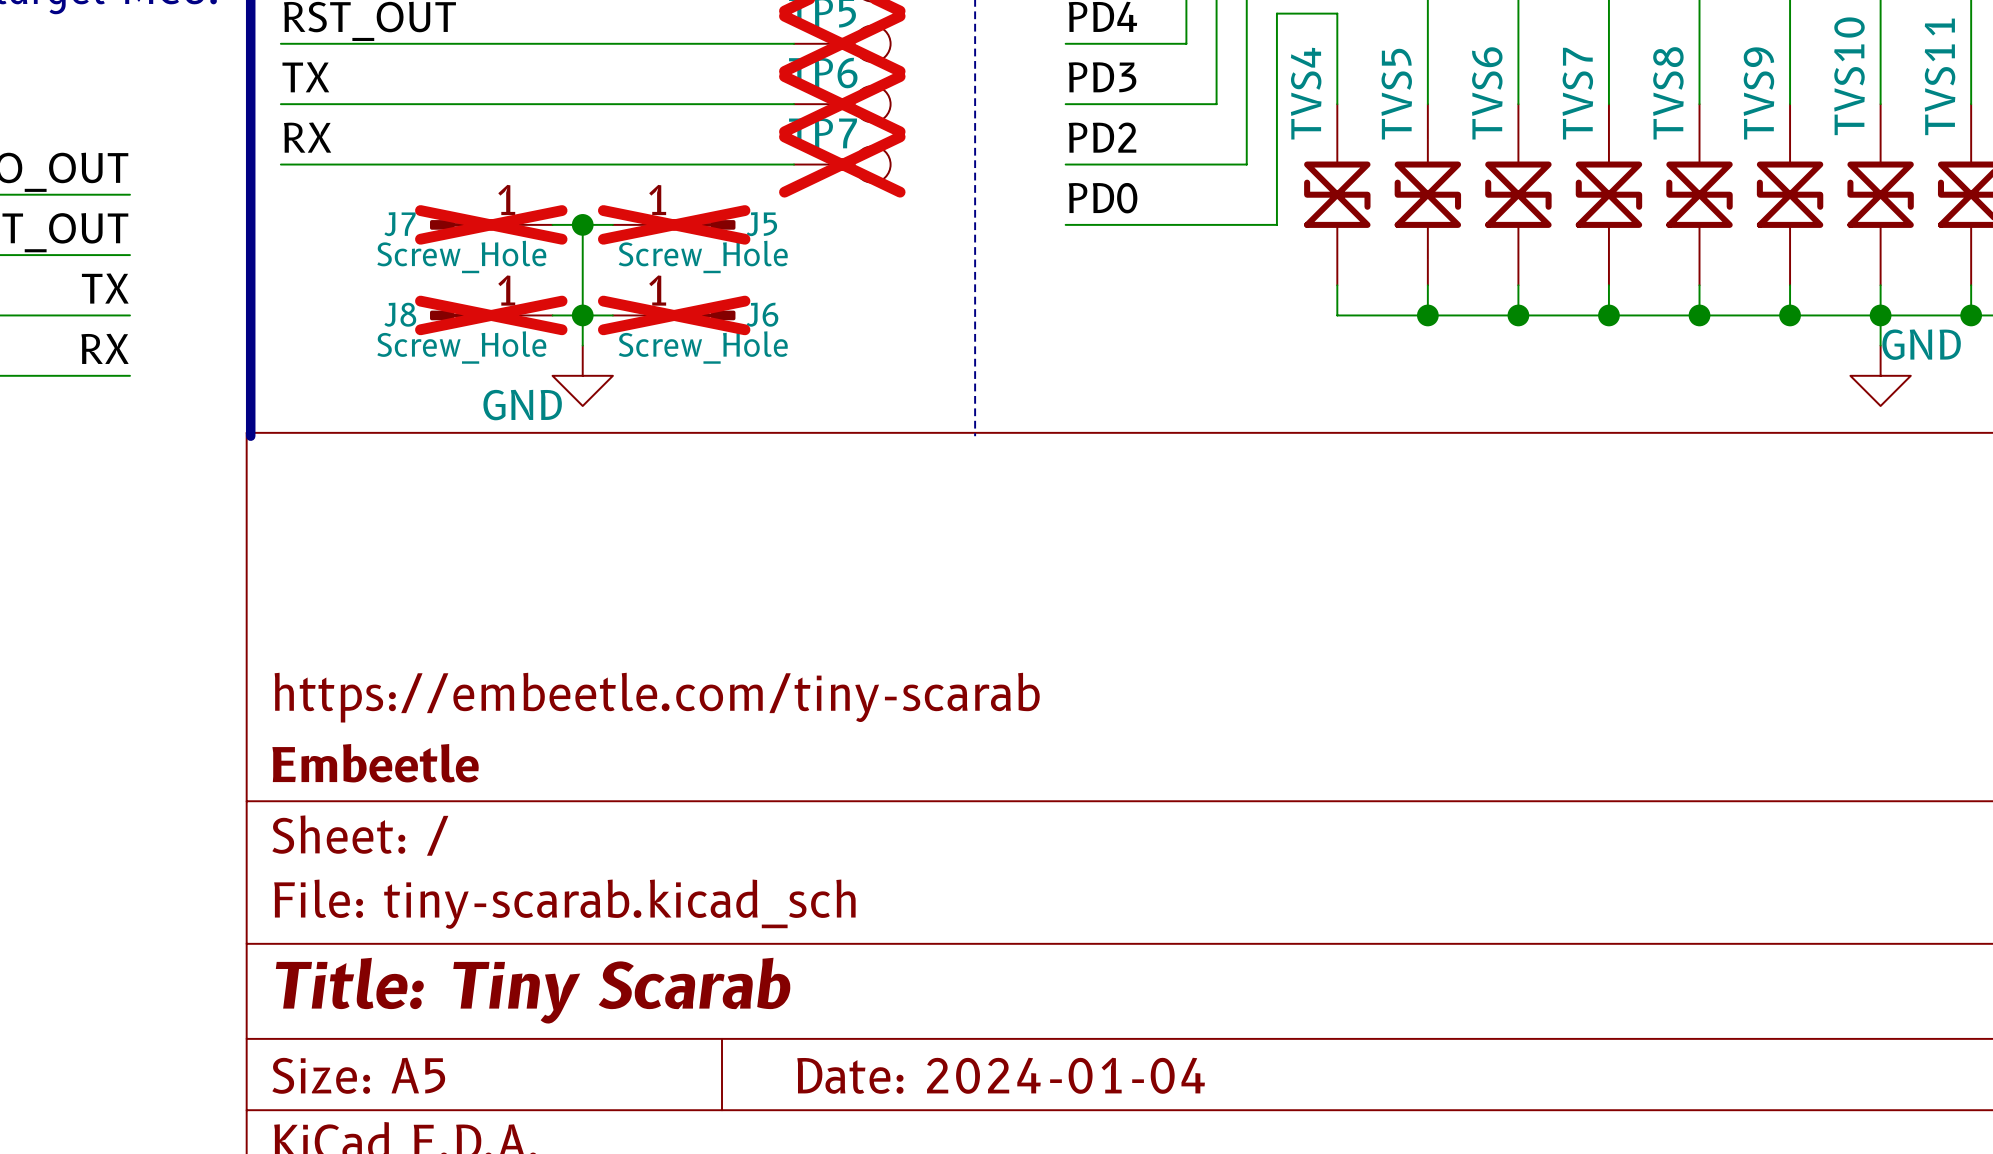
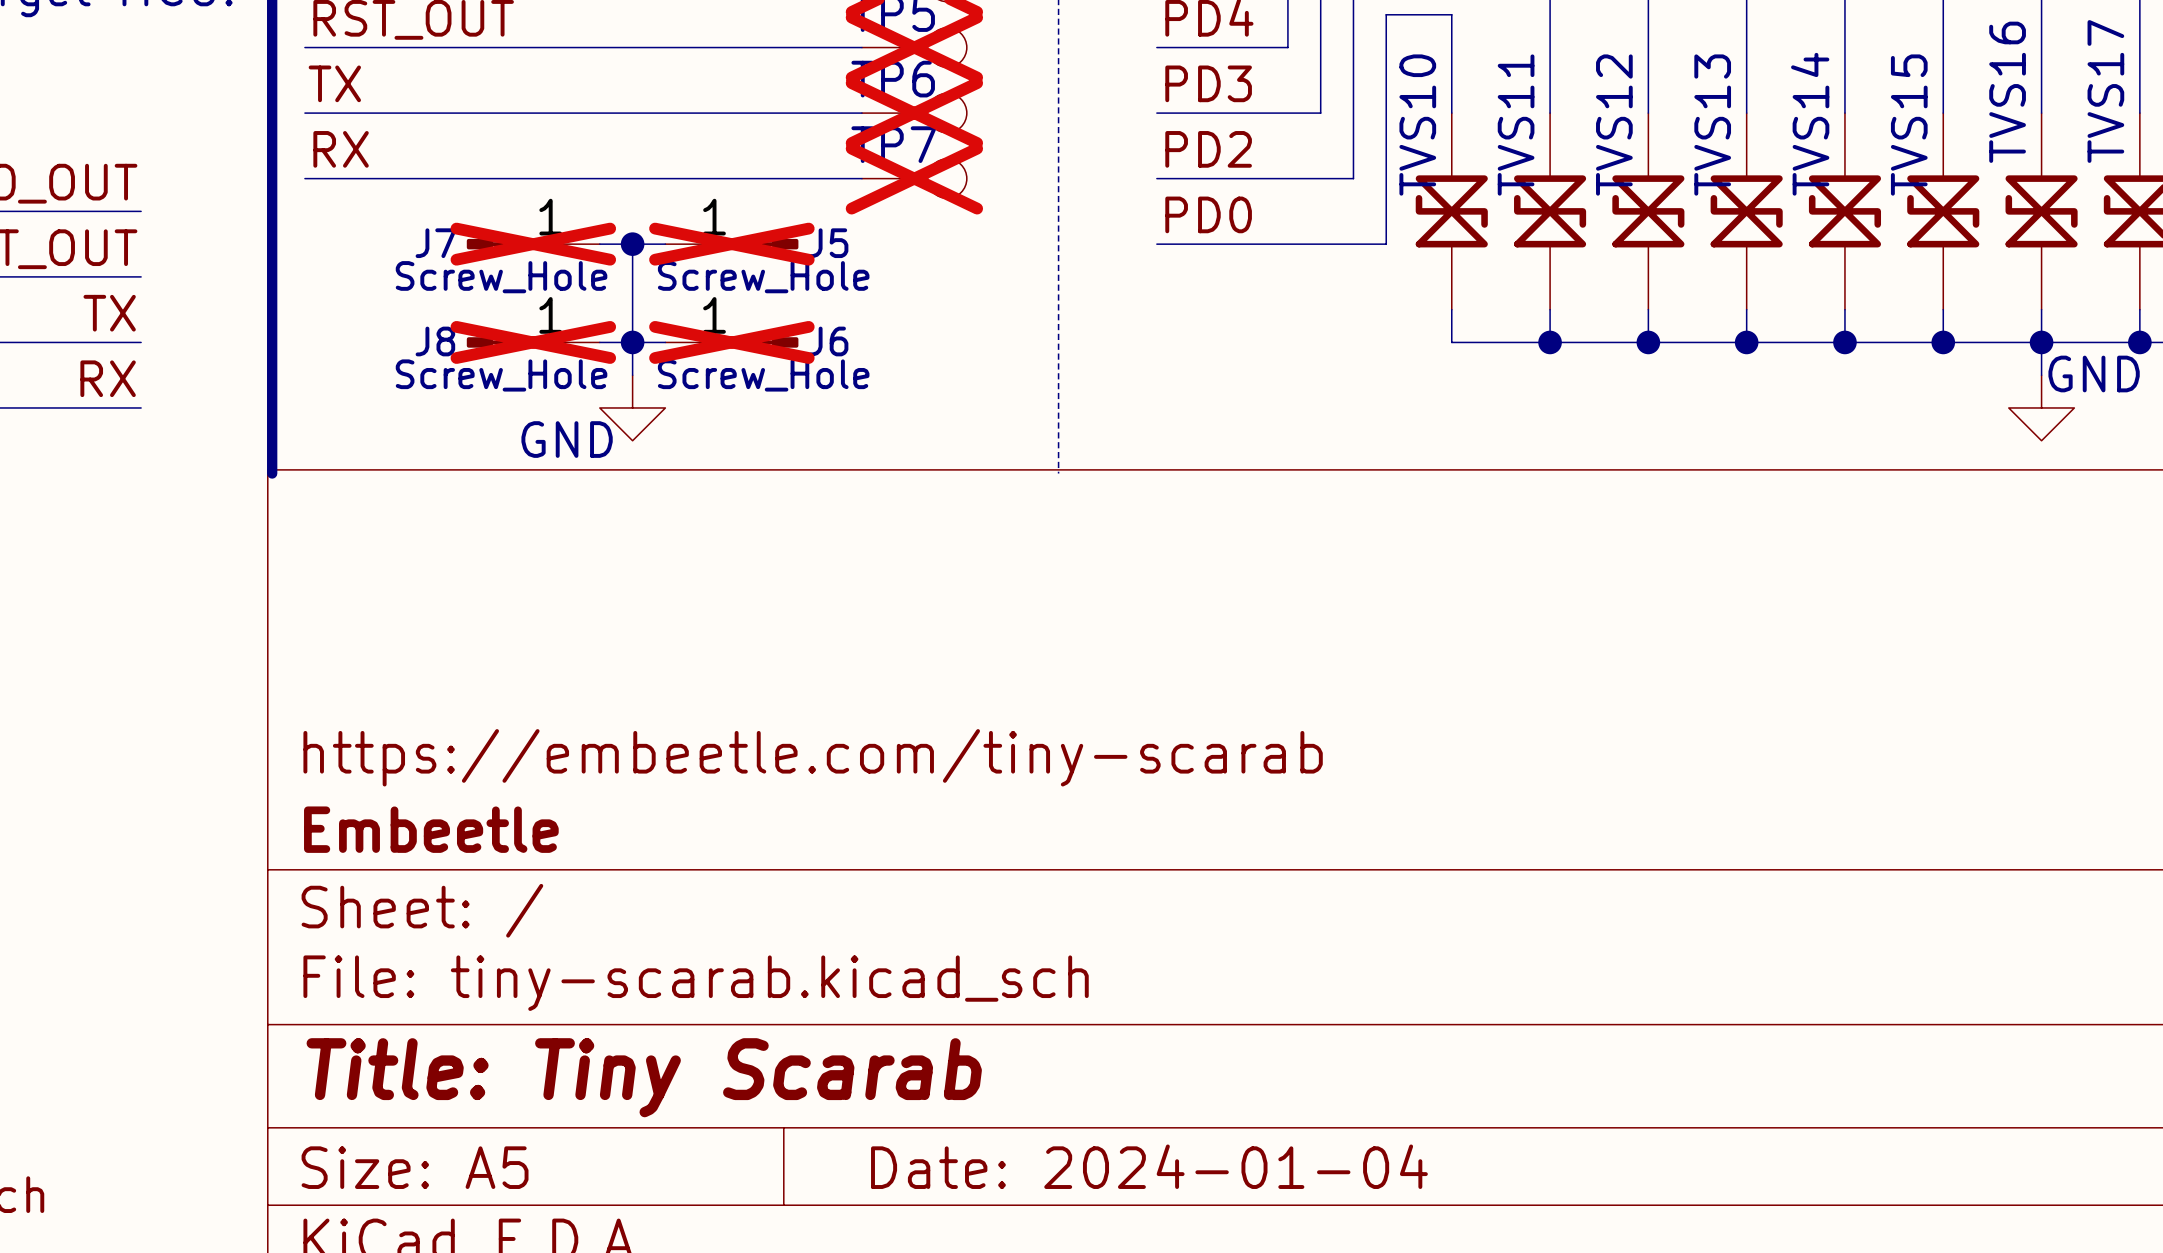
TVS10 name: TVS10 (1849, 76) -> TVS16 (2007, 92)
TVS11 name: TVS11 (1940, 76) -> TVS17 (2105, 91)
TVS4 name: TVS4 (1306, 93) -> TVS10 (1417, 125)
TVS6 name: TVS6 (1487, 93) -> TVS12 (1614, 125)
TVS7 name: TVS7 (1577, 93) -> TVS13 (1712, 125)
TVS8 name: TVS8 (1668, 93) -> TVS14 (1810, 124)
TVS9 name: TVS9 (1758, 93) -> TVS15 (1909, 125)
TVS5 name: TVS5 (1396, 94) -> TVS11 (1516, 125)

